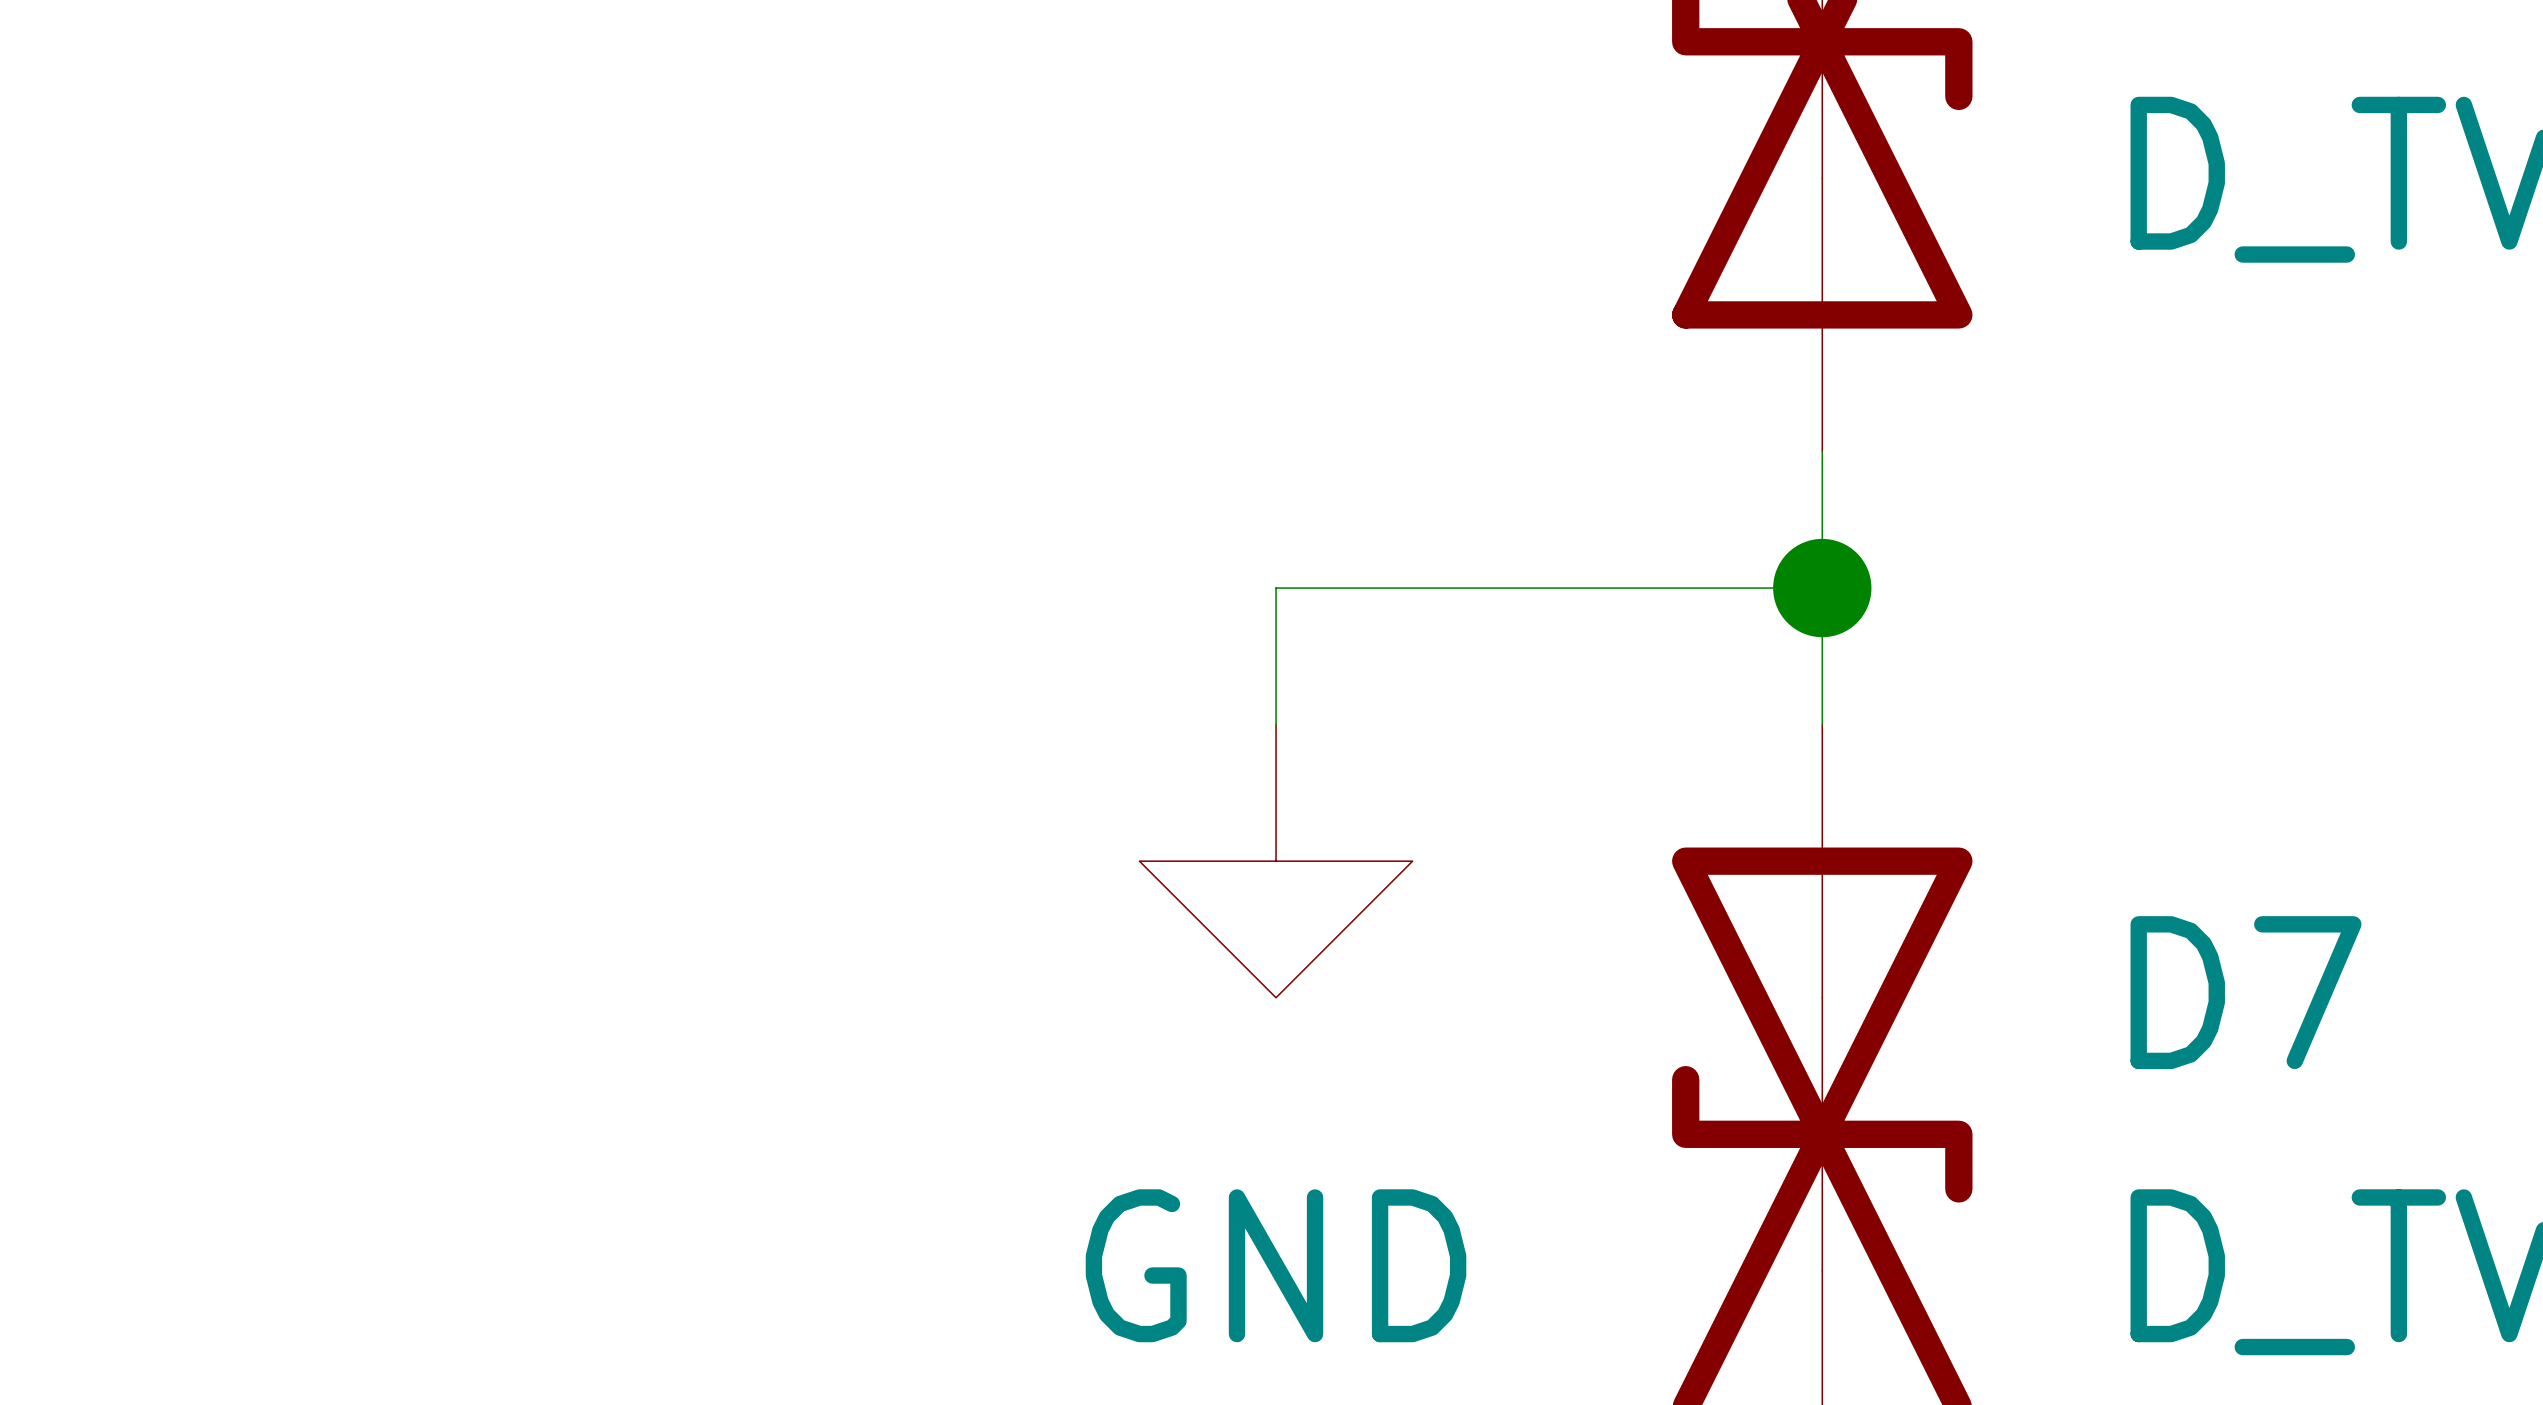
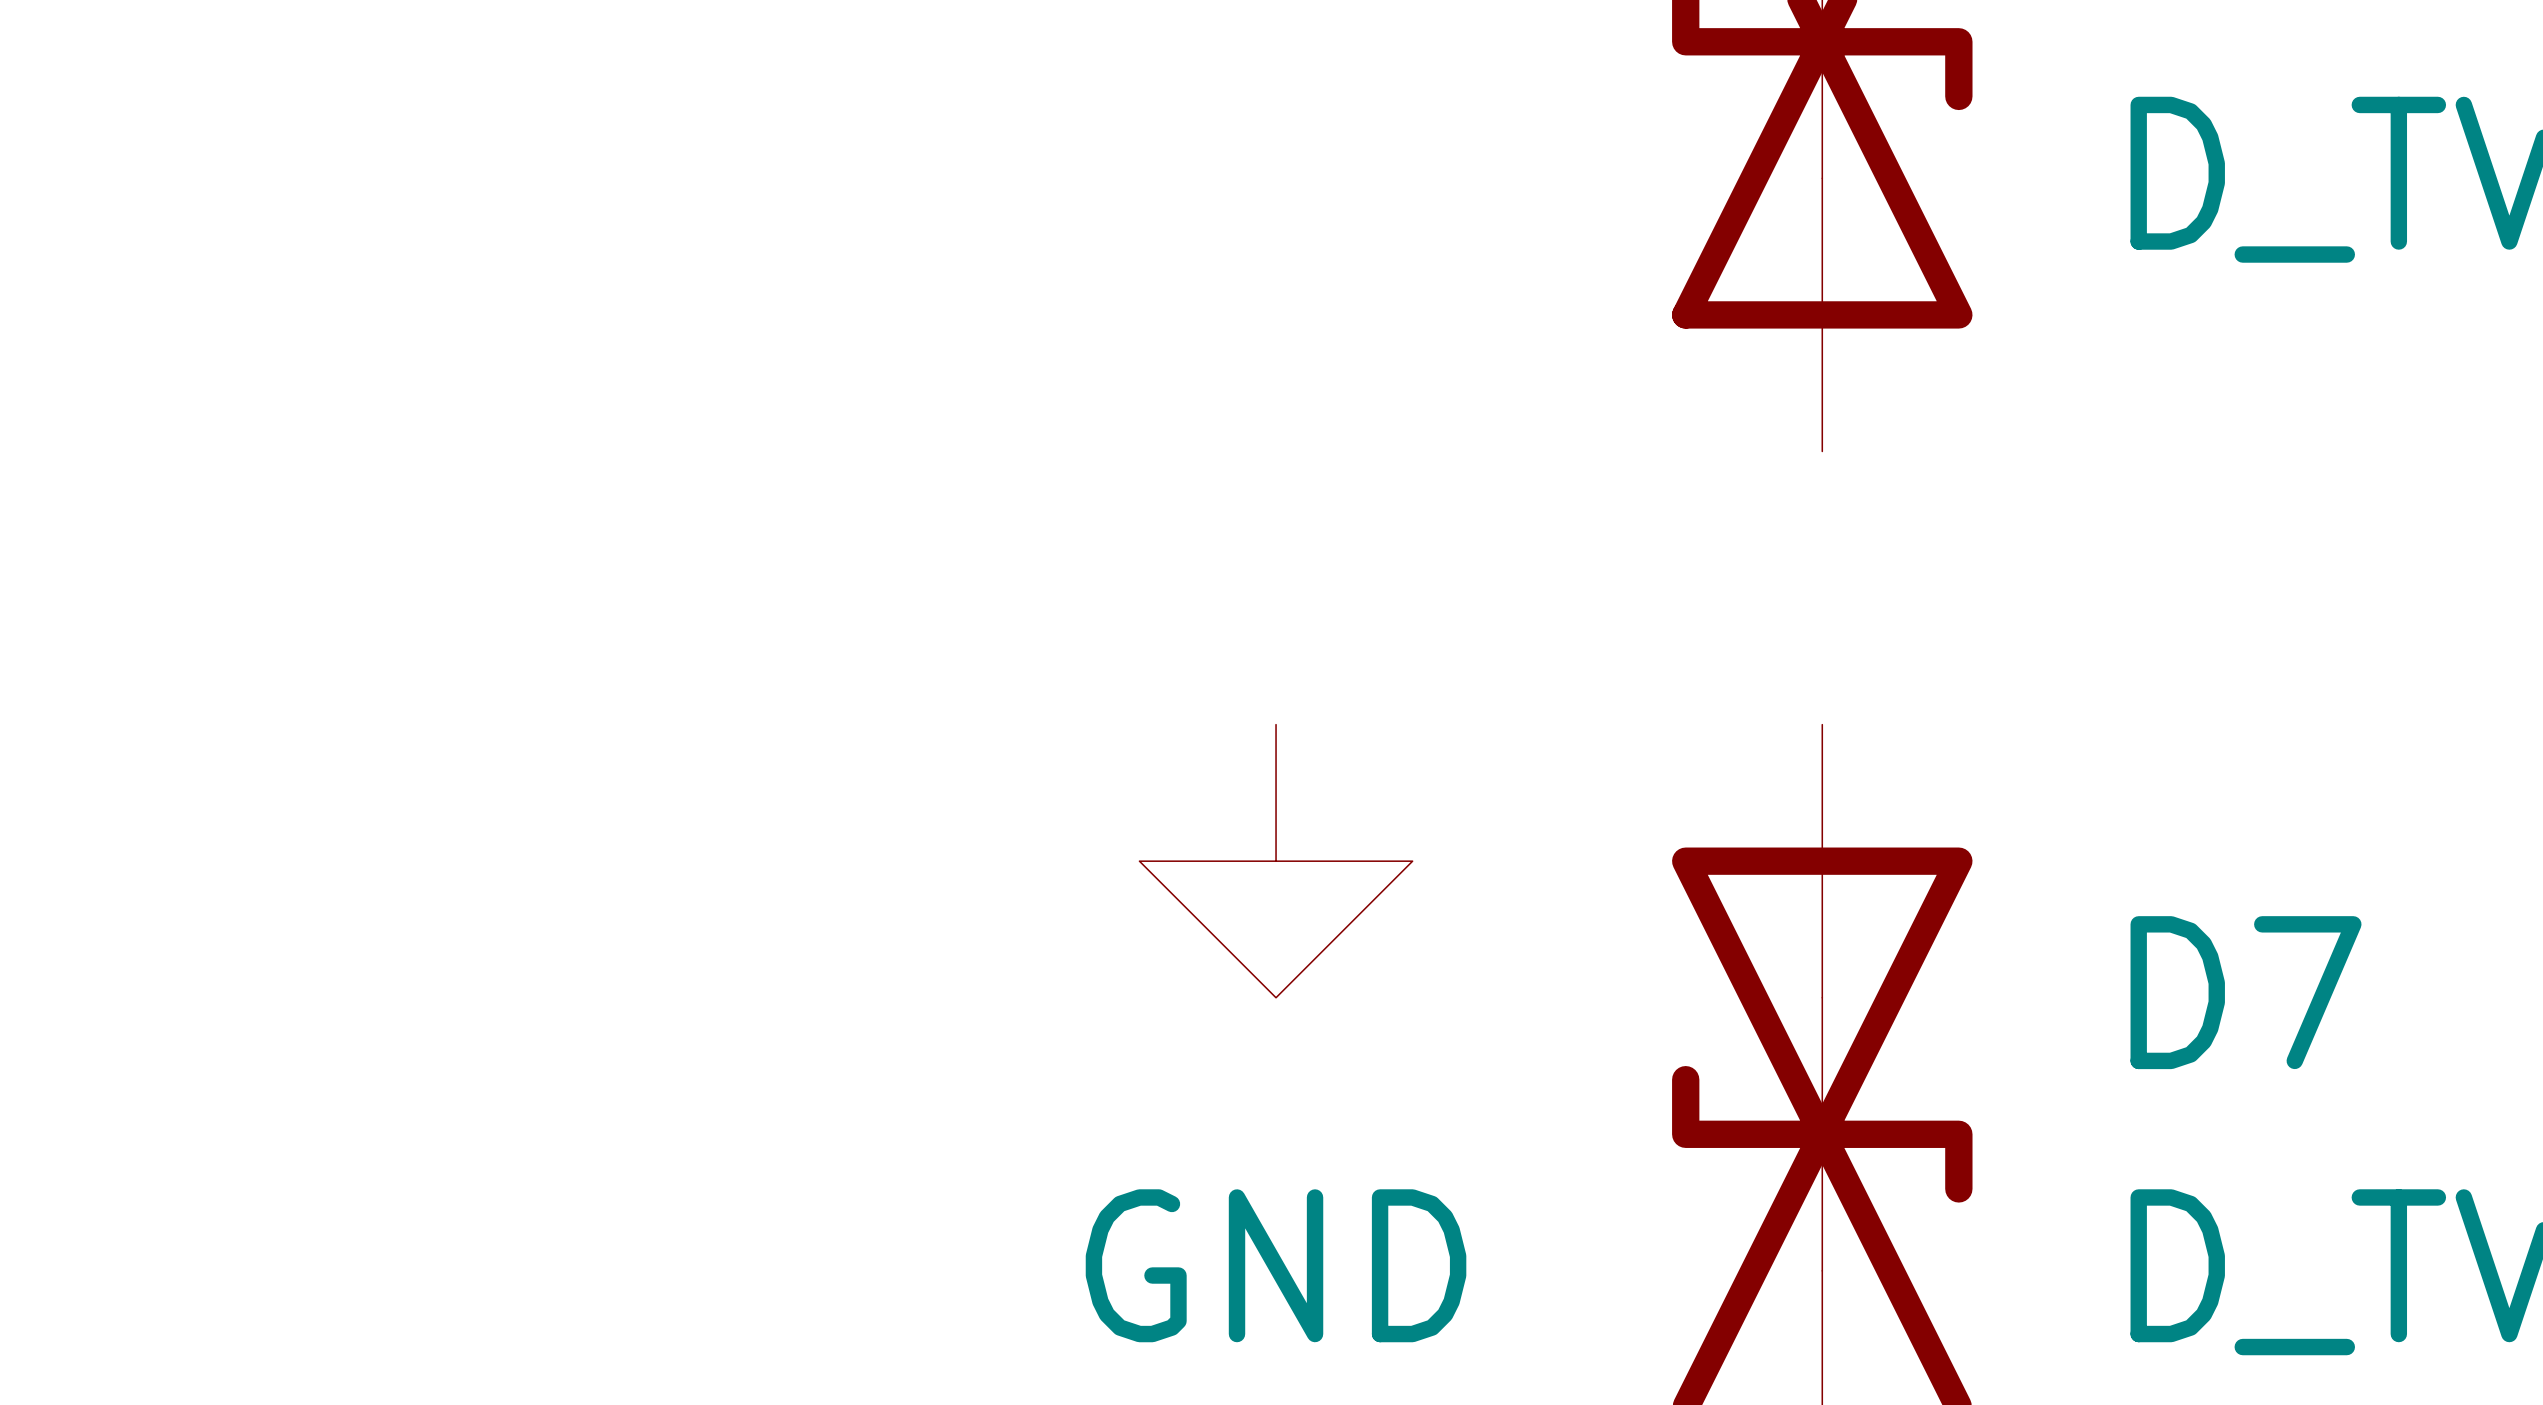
wire: (1822, 451) (1822, 724) -> none
wire: (1822, 588) (1276, 588) (1276, 724) -> none
junction: (1822, 588) -> none

